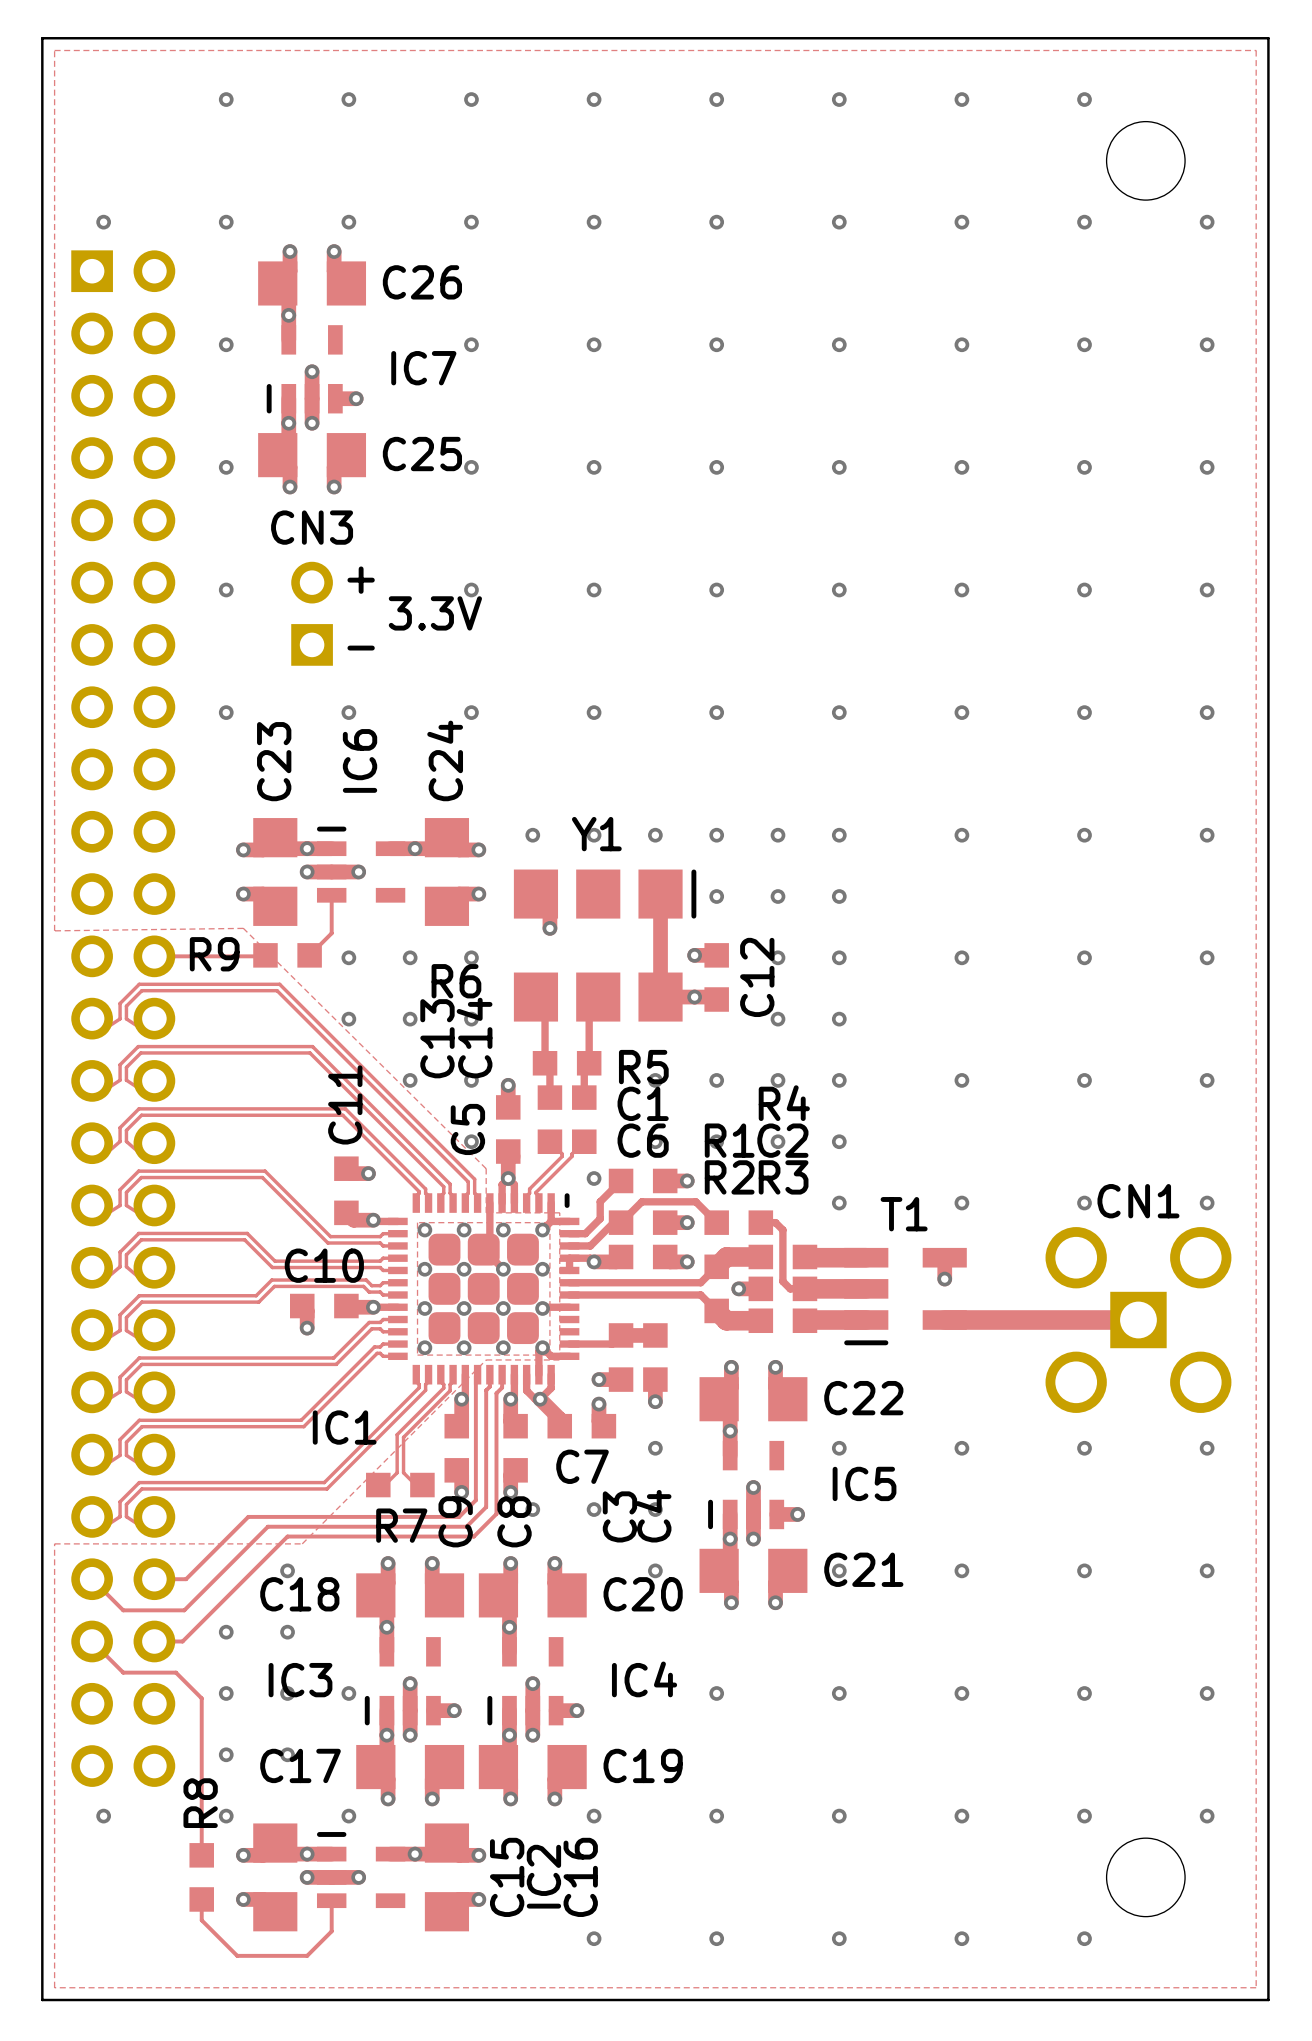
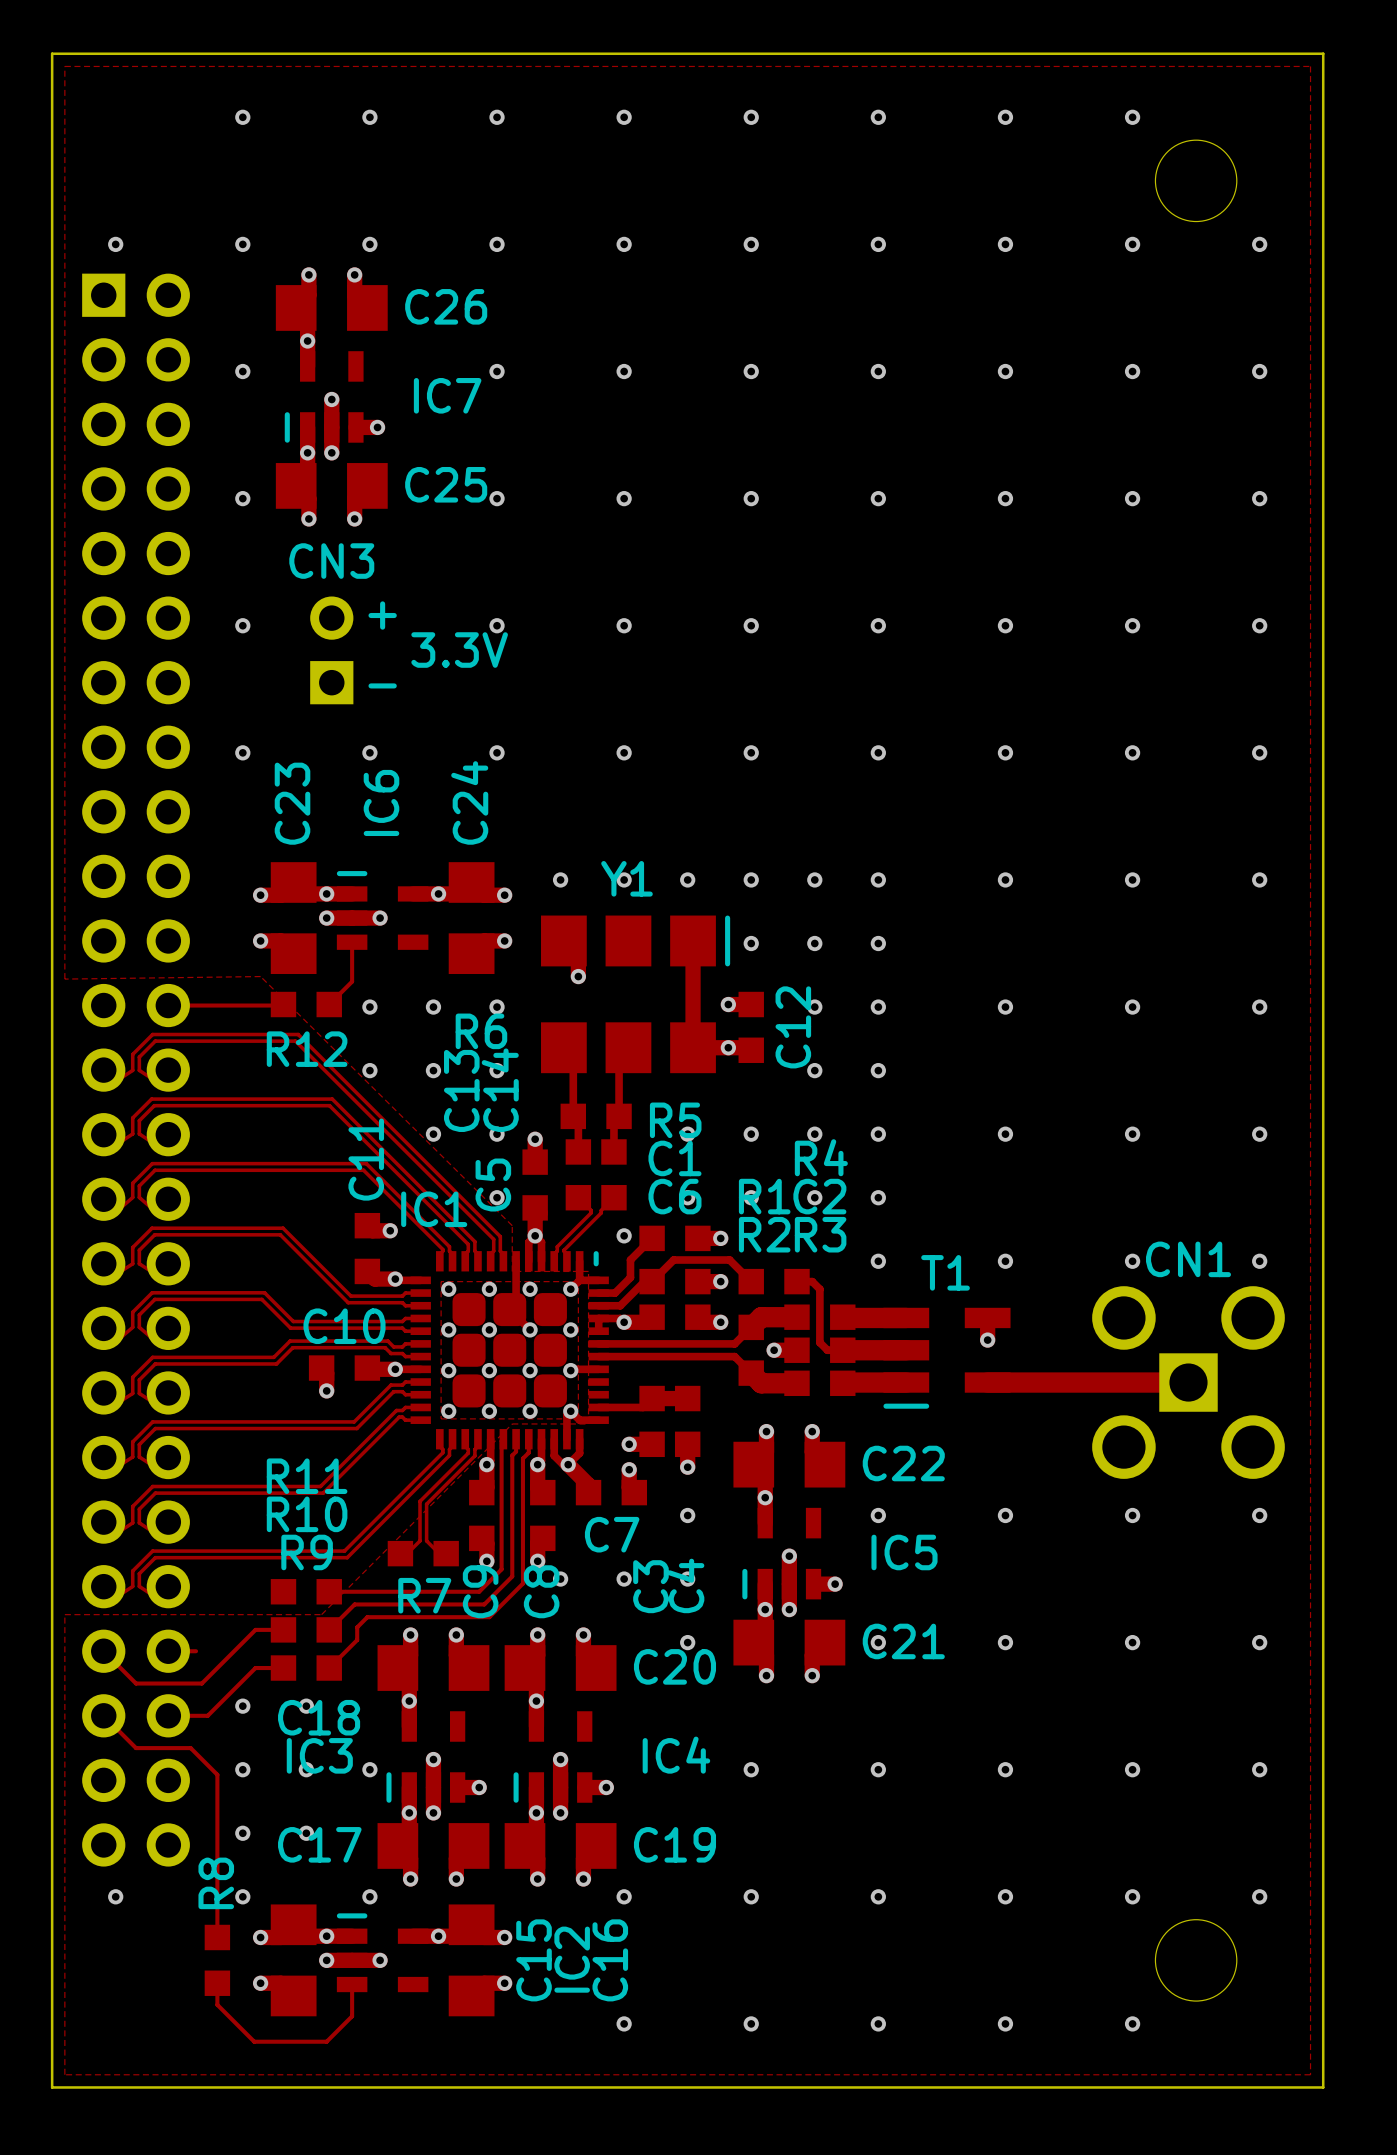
R9 name: R9 (214, 954) -> R12 (307, 1049)
IC1 name position: IC1 (344, 1427) -> IC1 (434, 1209)
track: (459, 1516) (248, 1516) (186, 1579) (181, 1579) -> (484, 1586) (479, 1591) (329, 1591)
R11: none -> (306, 1591)
track: (466, 1526) (267, 1526) (184, 1610) -> (491, 1596) (484, 1604) (354, 1604) (329, 1629)
track: (473, 1536) (287, 1536) (182, 1641) -> (499, 1607) (489, 1617) (367, 1617) (357, 1627) (357, 1640) (329, 1668)
track: none -> (283, 1629) (255, 1629) (201, 1683) (199, 1683)
R10: none -> (306, 1629)
via: (287, 1570) -> none
C18 name position: C18 (299, 1594) -> C18 (319, 1717)
track: none -> (283, 1668) (255, 1668) (207, 1715) (197, 1715)
R9: none -> (306, 1668)

